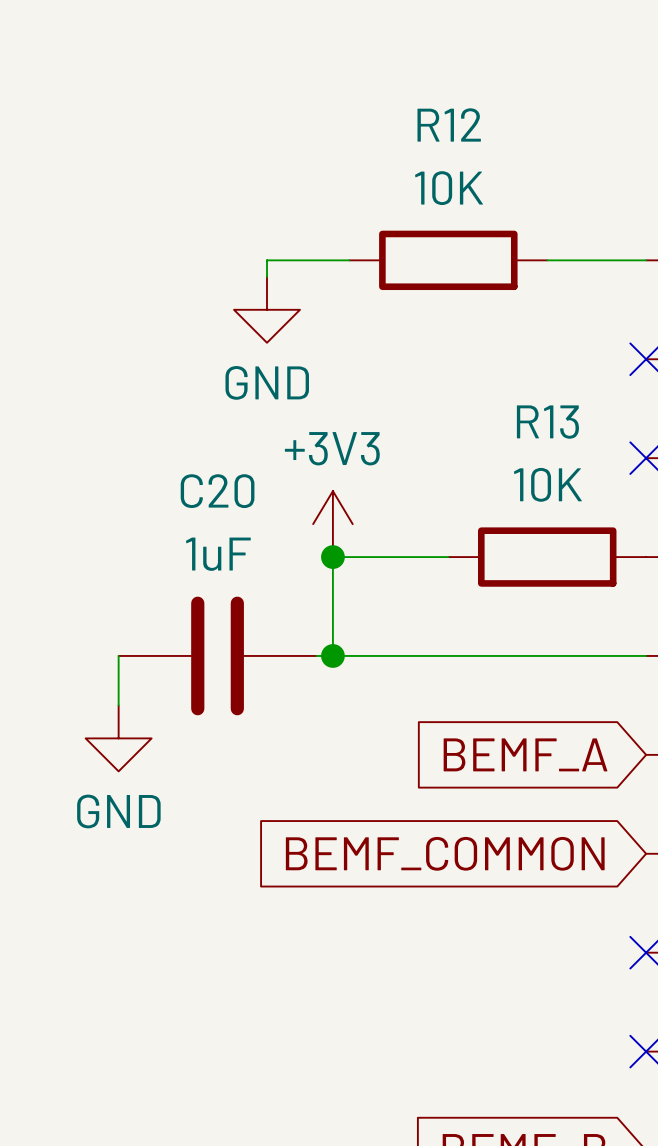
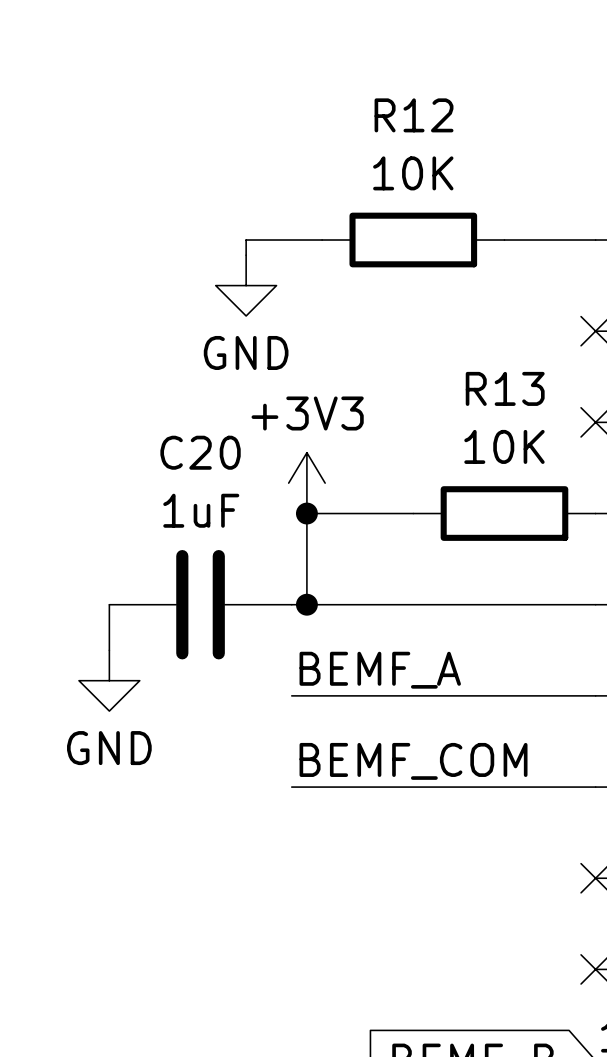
label: none -> BEMF_A (380, 670)
wire: none -> (291, 695) (595, 695)
global label: BEMF_A (525, 754) -> none
label: none -> BEMF_COM (413, 761)
wire: none -> (291, 787) (595, 787)
global label: BEMF_COMMON (445, 853) -> none

